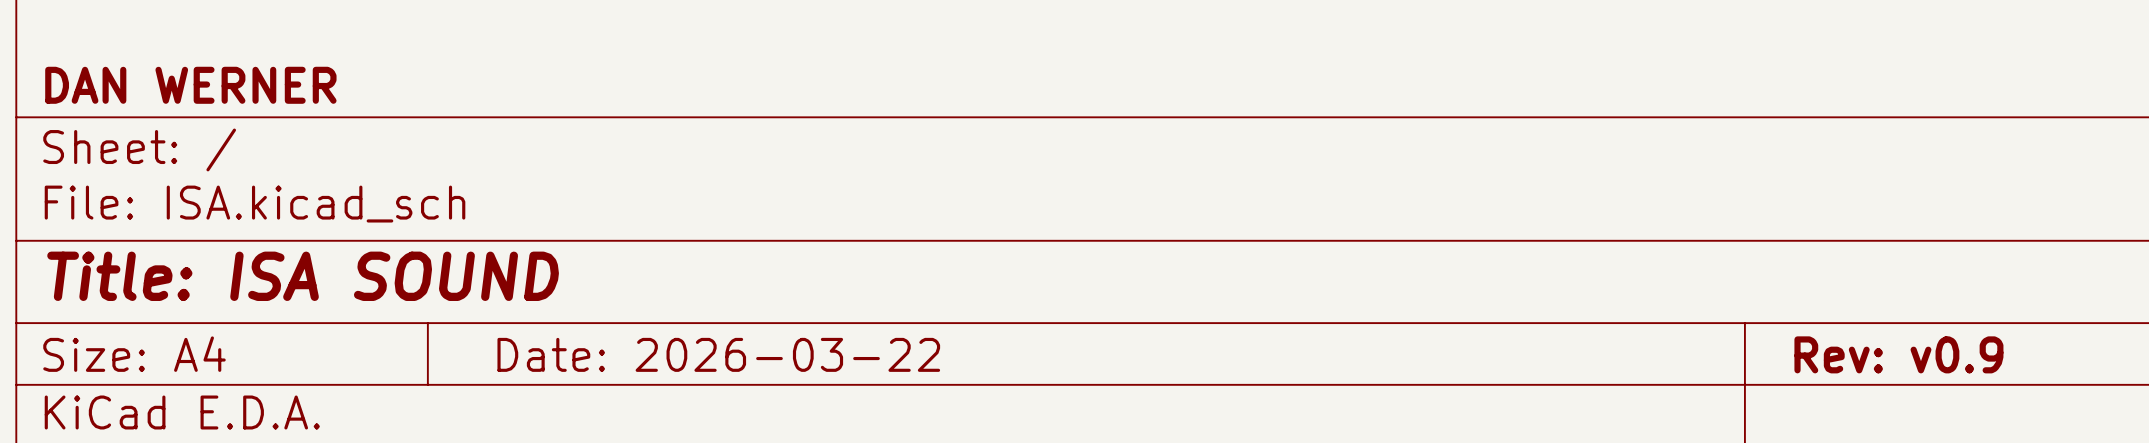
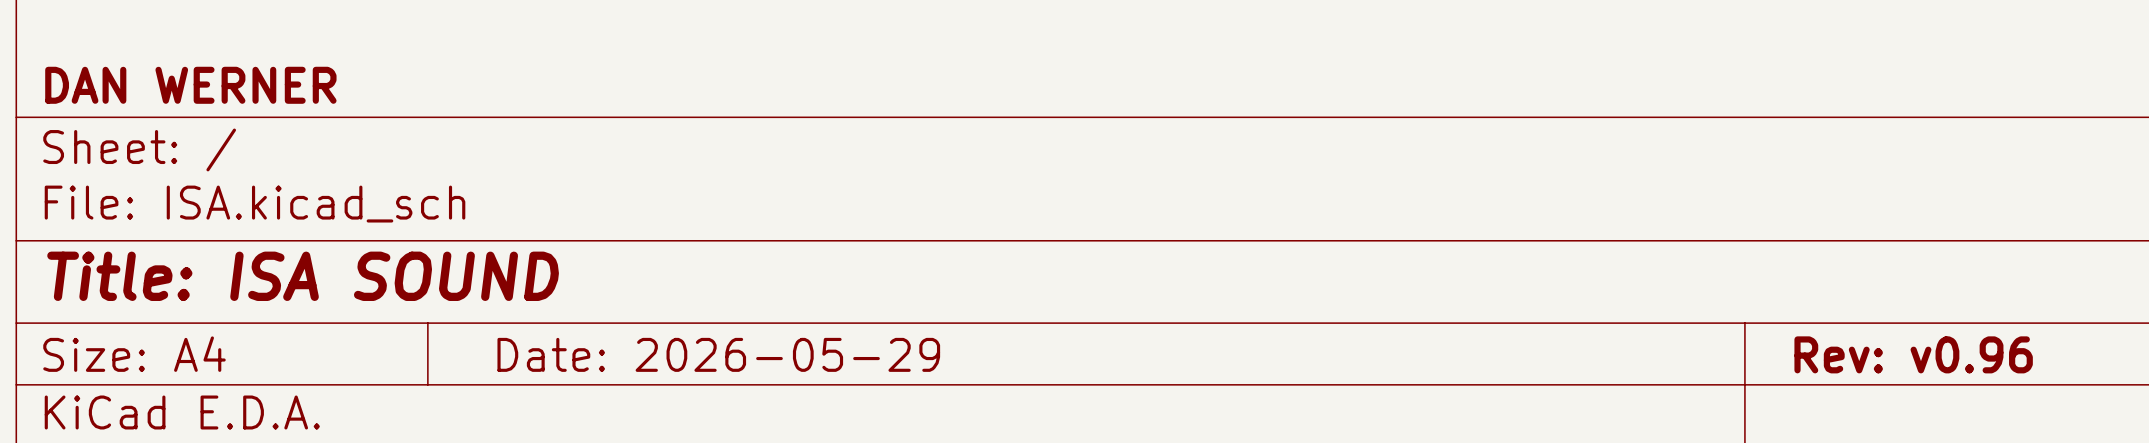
title block: Date: 2026-03-22 (718, 354) -> Date: 2026-05-29 (718, 354)
title block: Rev: v0.9 (1898, 354) -> Rev: v0.96 (1913, 354)

